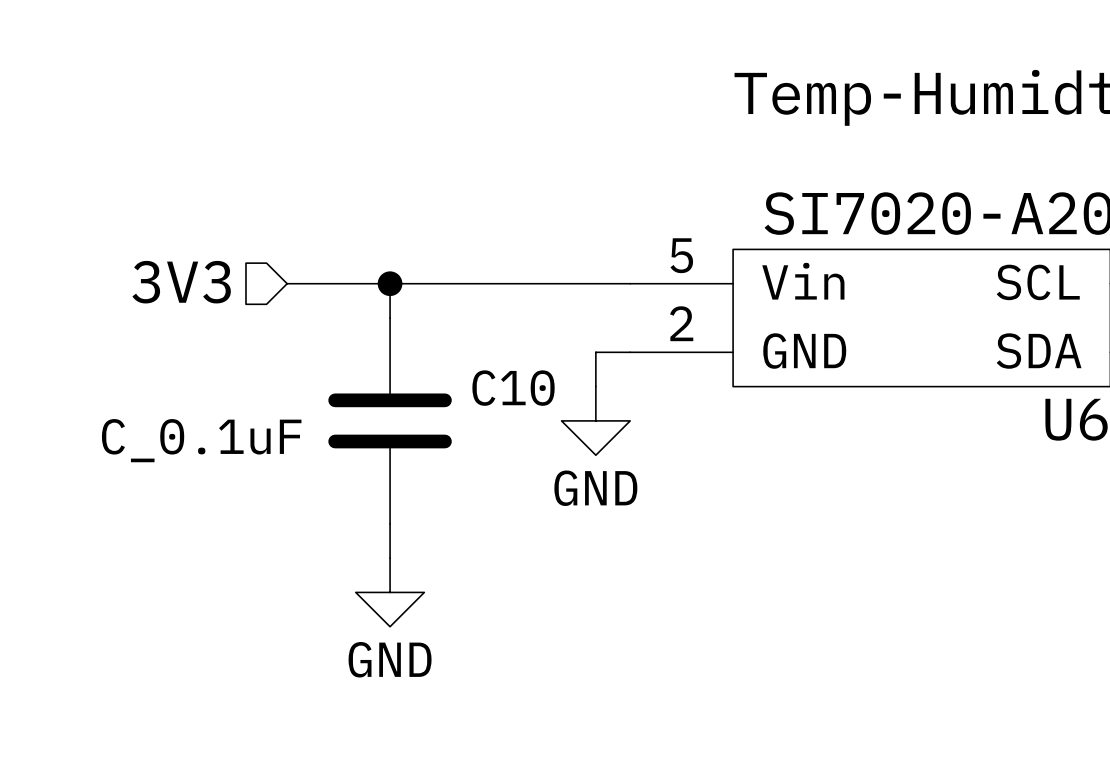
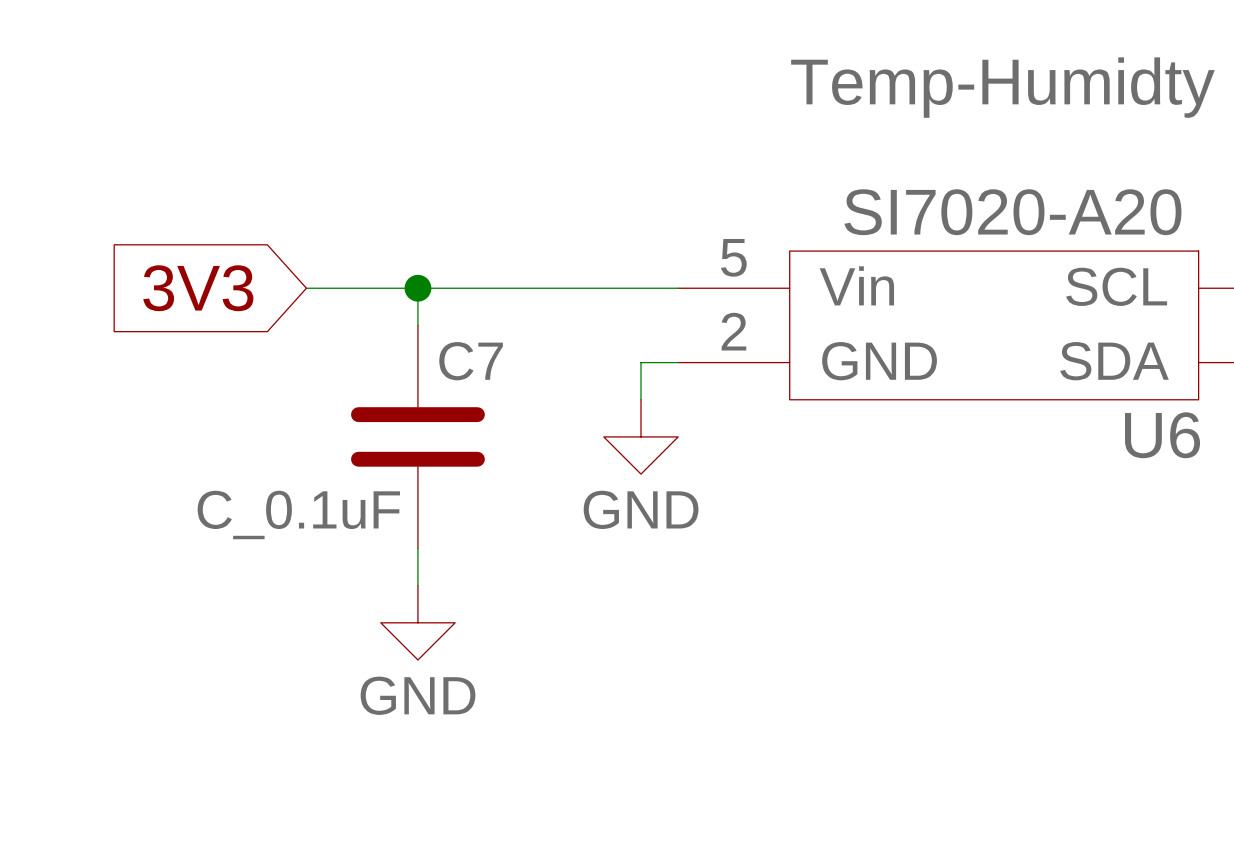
hierarchical label: 3V3 (181, 282) -> none
global label: none -> 3V3 (198, 288)
C10 name: C10 (513, 388) -> C7 (471, 361)
C10 value position: C_0.1uF (201, 440) -> C_0.1uF (298, 514)

